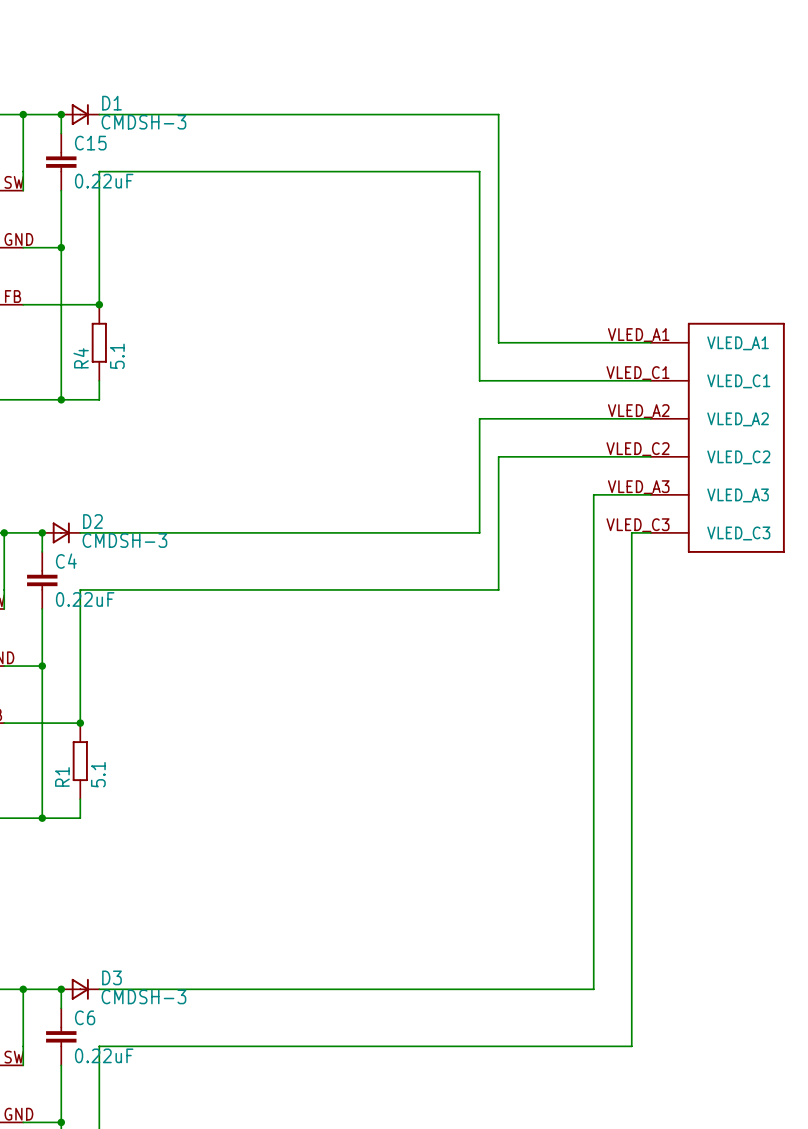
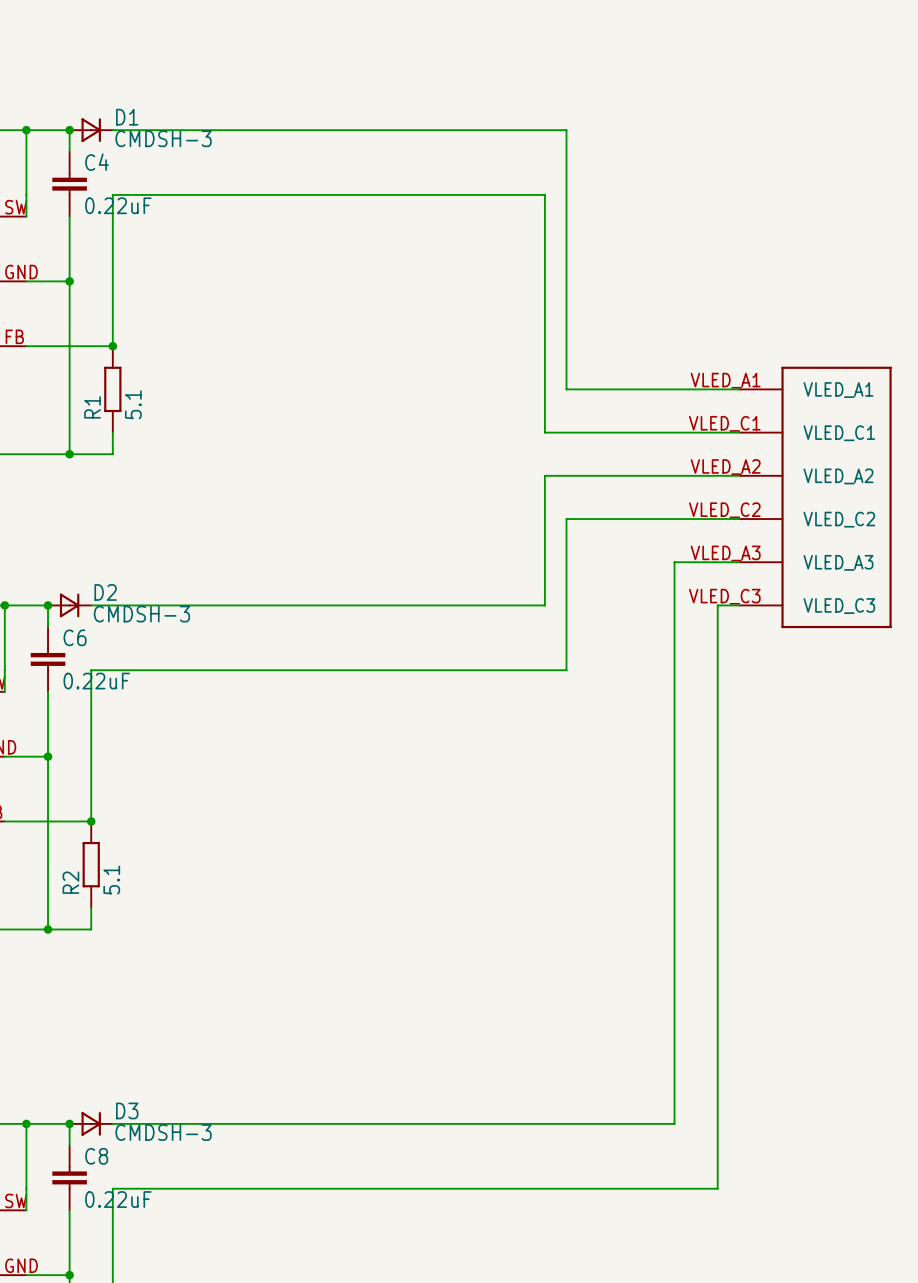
C15 name: C15 (90, 143) -> C4 (96, 162)
R4 name: R4 (81, 358) -> R1 (92, 407)
C4 name: C4 (66, 561) -> C6 (75, 637)
R1 name: R1 (62, 776) -> R2 (70, 882)
C6 name: C6 (85, 1017) -> C8 (96, 1156)

